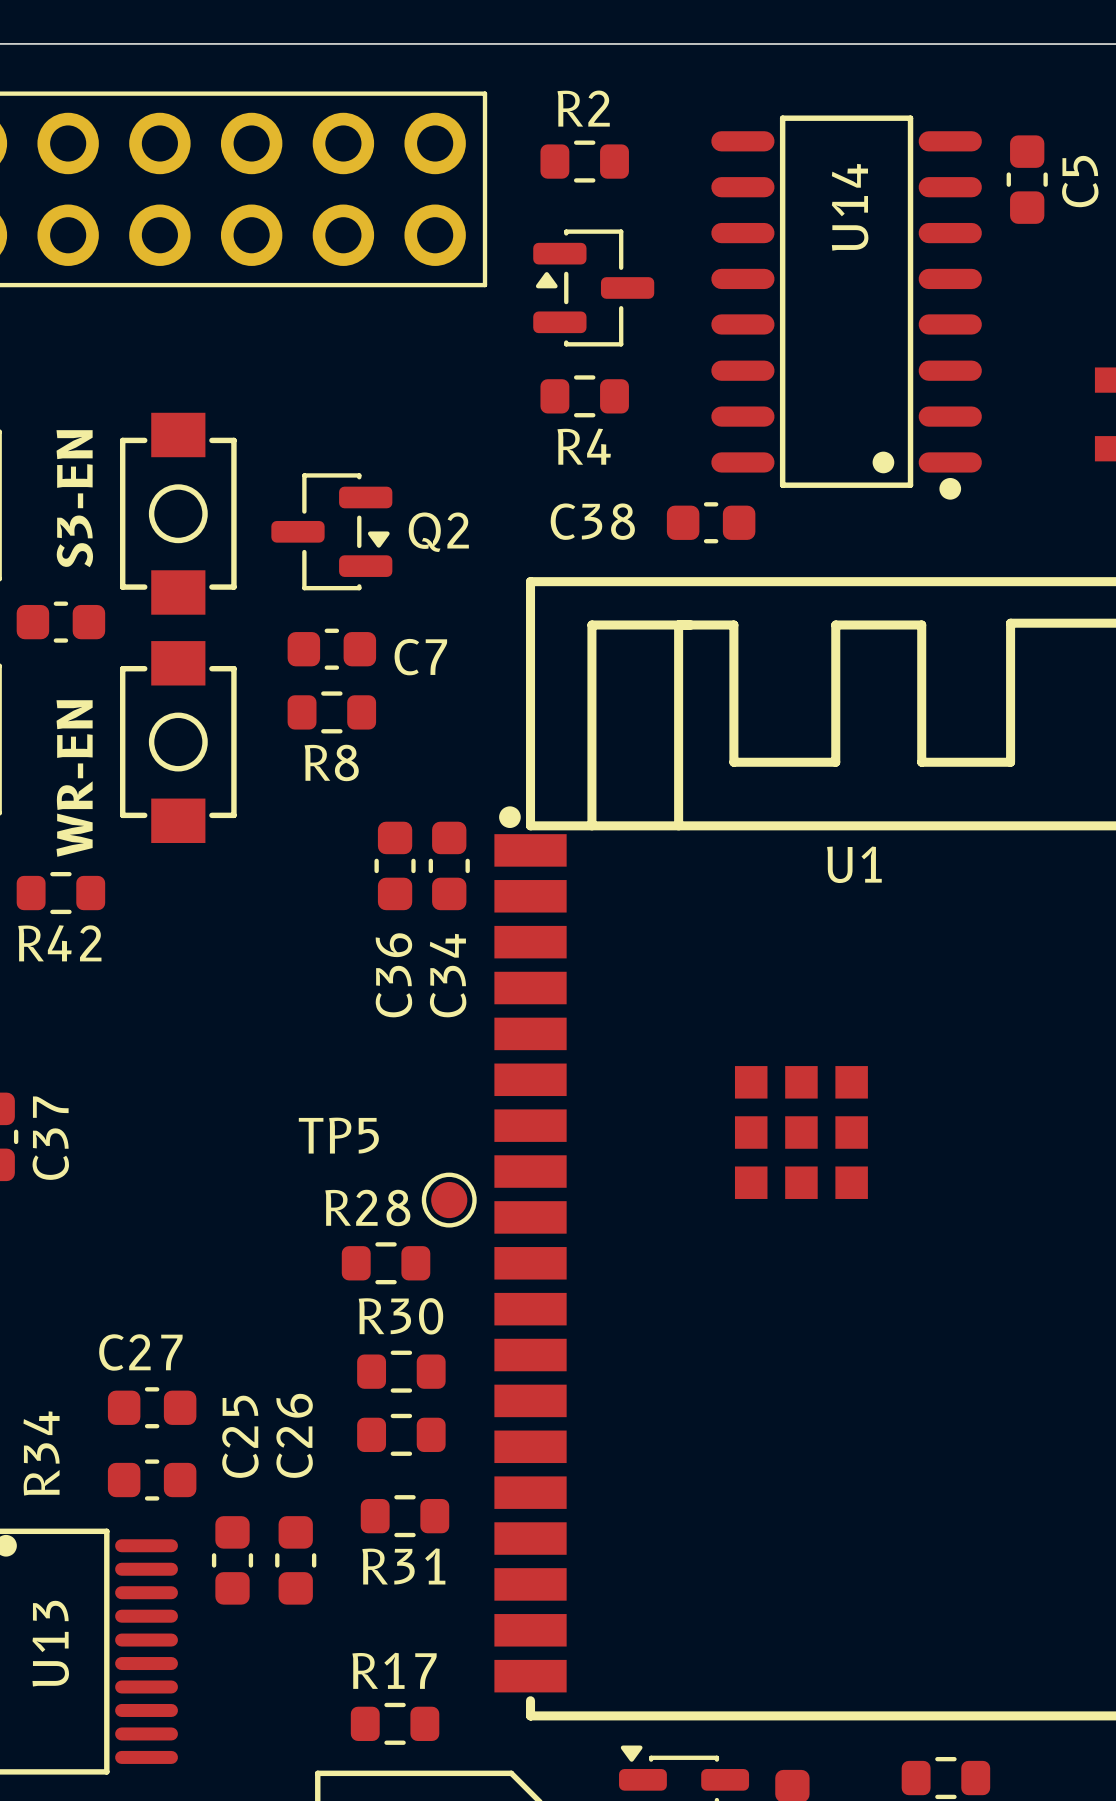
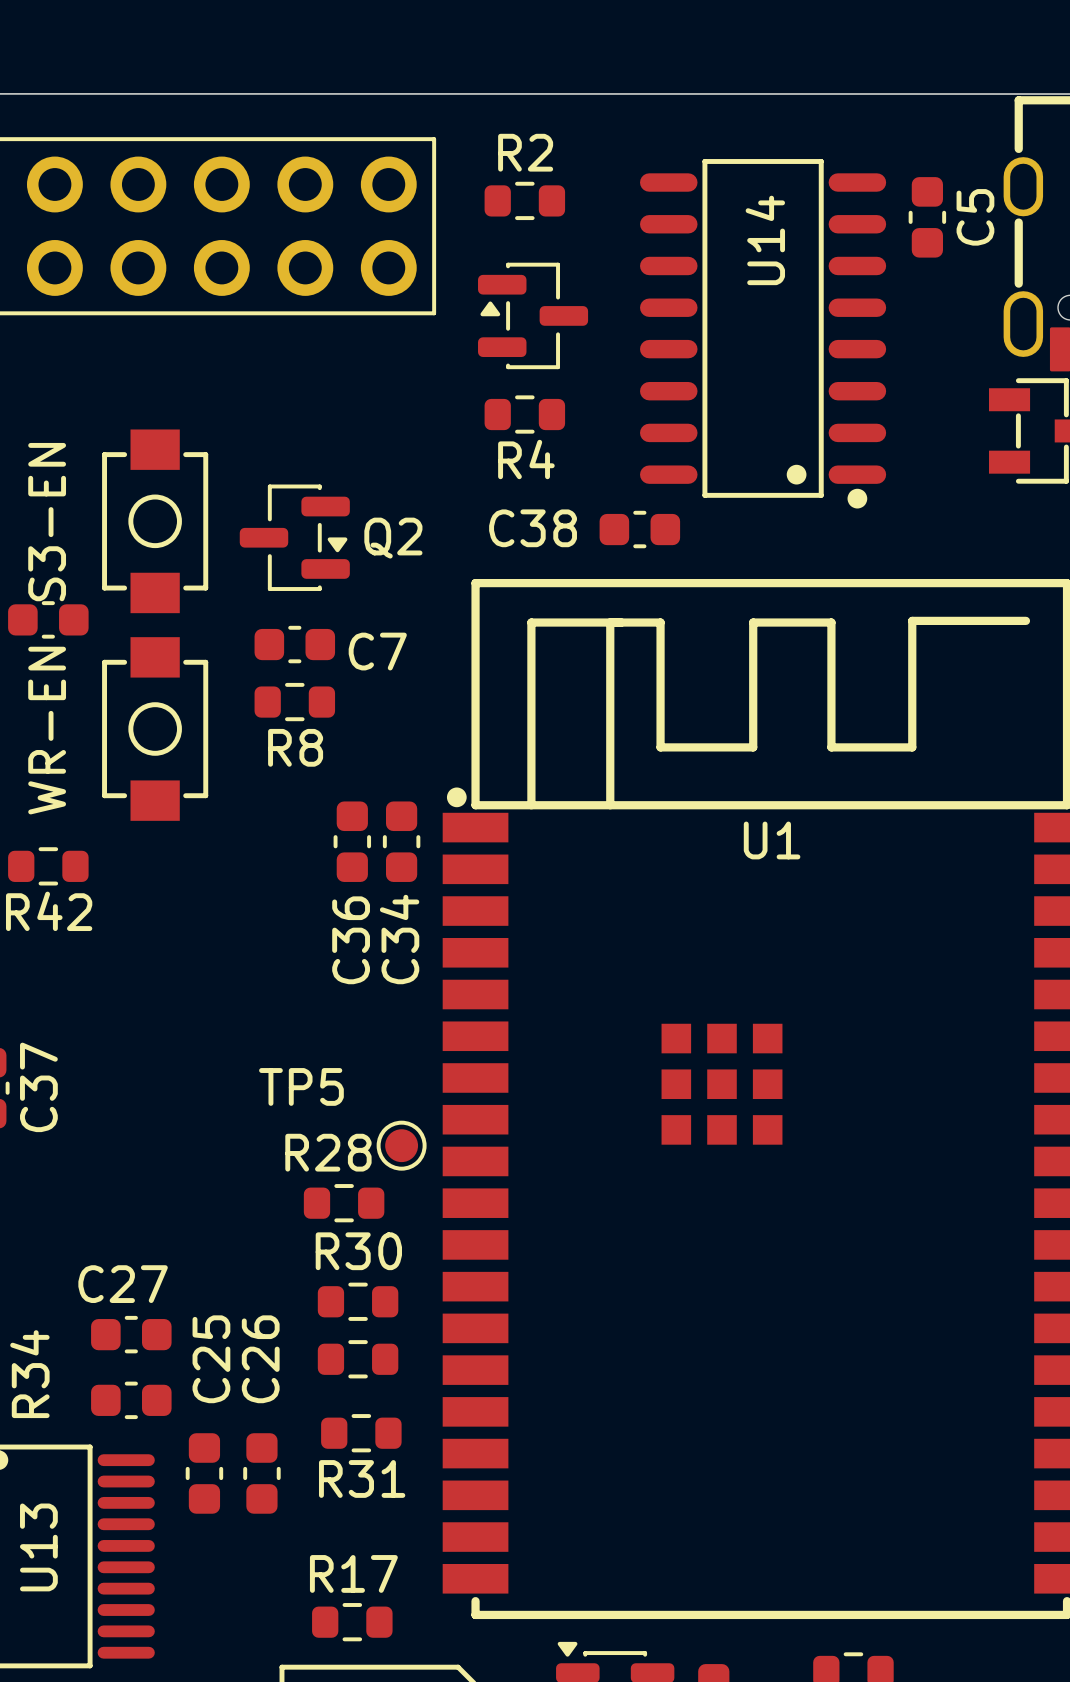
text: S3-EN (74, 498) -> none
S3-EN name: none -> S3-EN (47, 522)
WR-EN name: none -> WR-EN (47, 730)
text: WR-EN (74, 778) -> none

